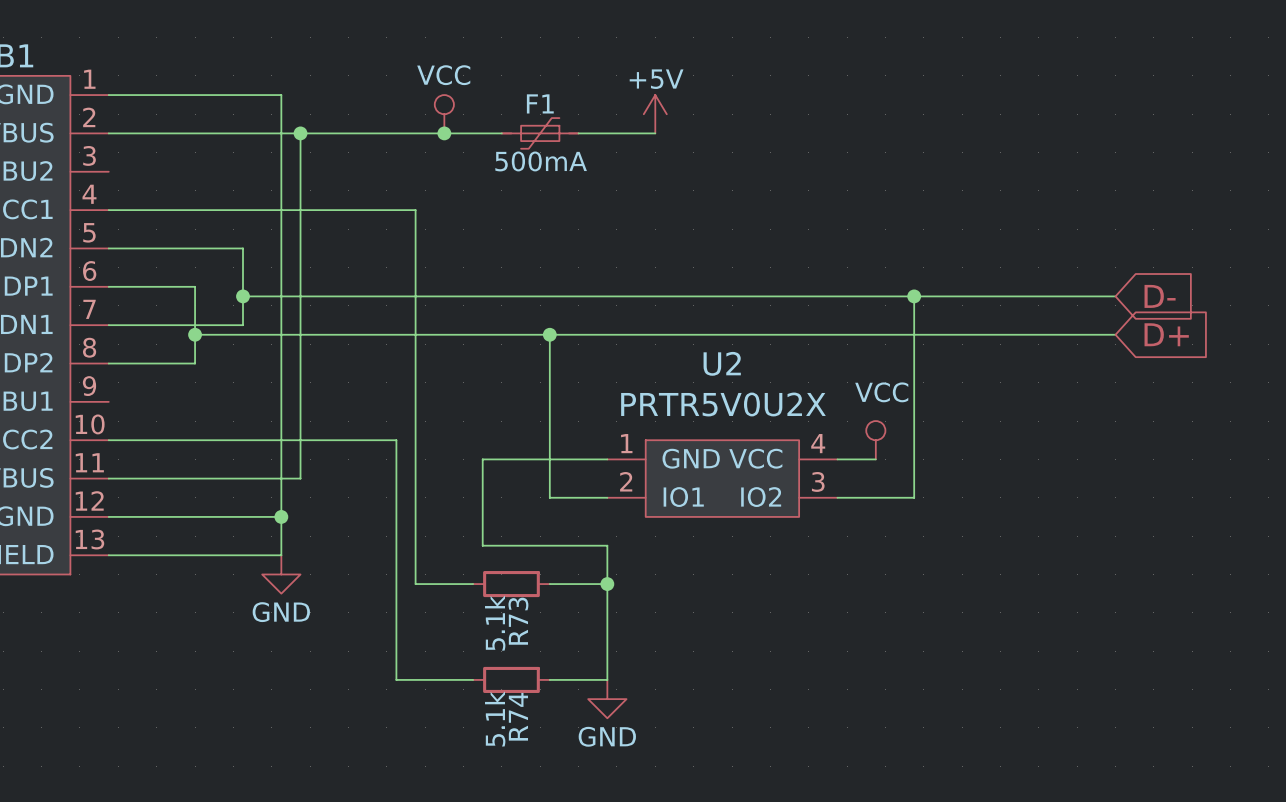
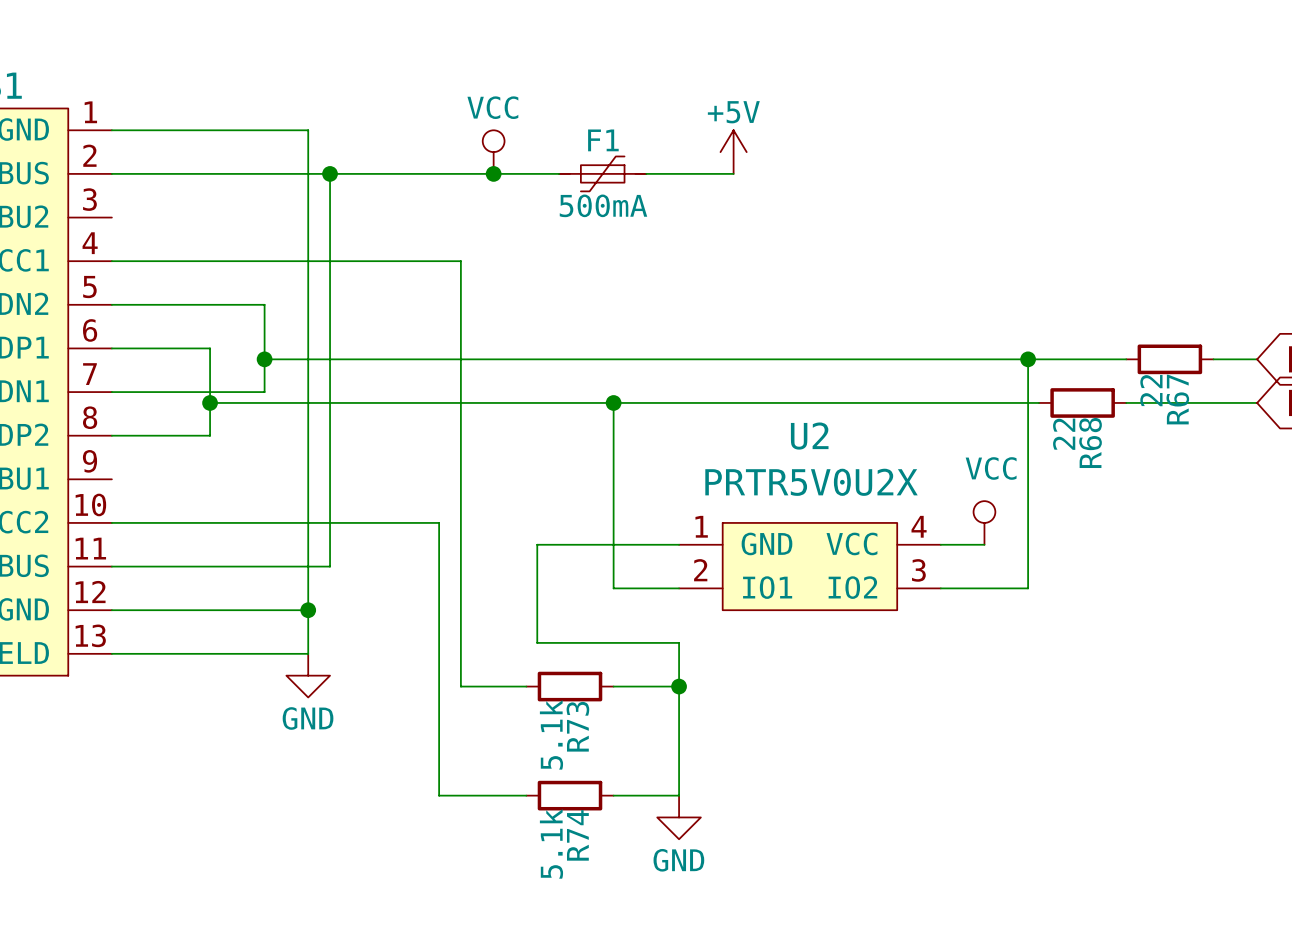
wire: (1000, 296) (1077, 296) -> none
R67: none -> 22 (1169, 359)
wire: (923, 334) (1000, 334) -> none
R68: none -> 22 (1082, 402)

